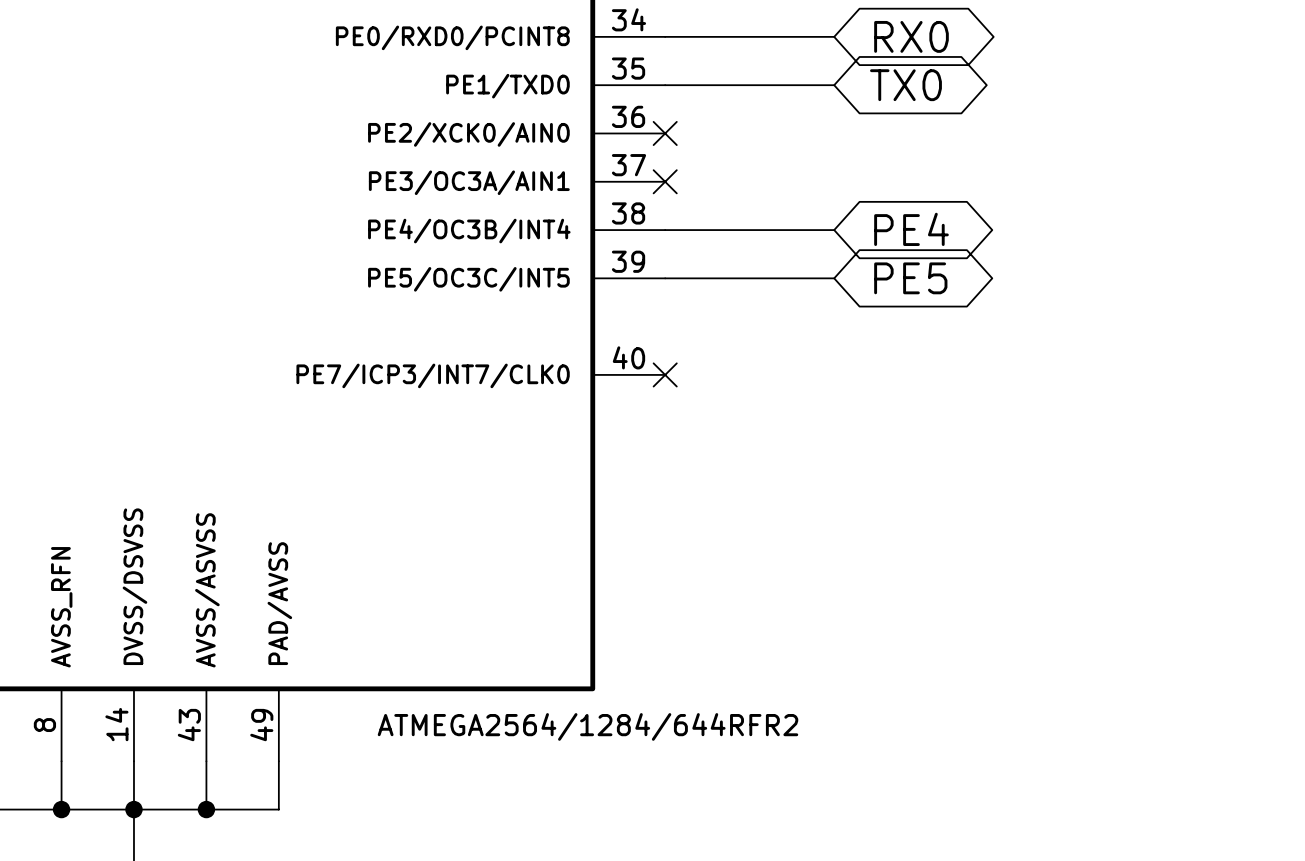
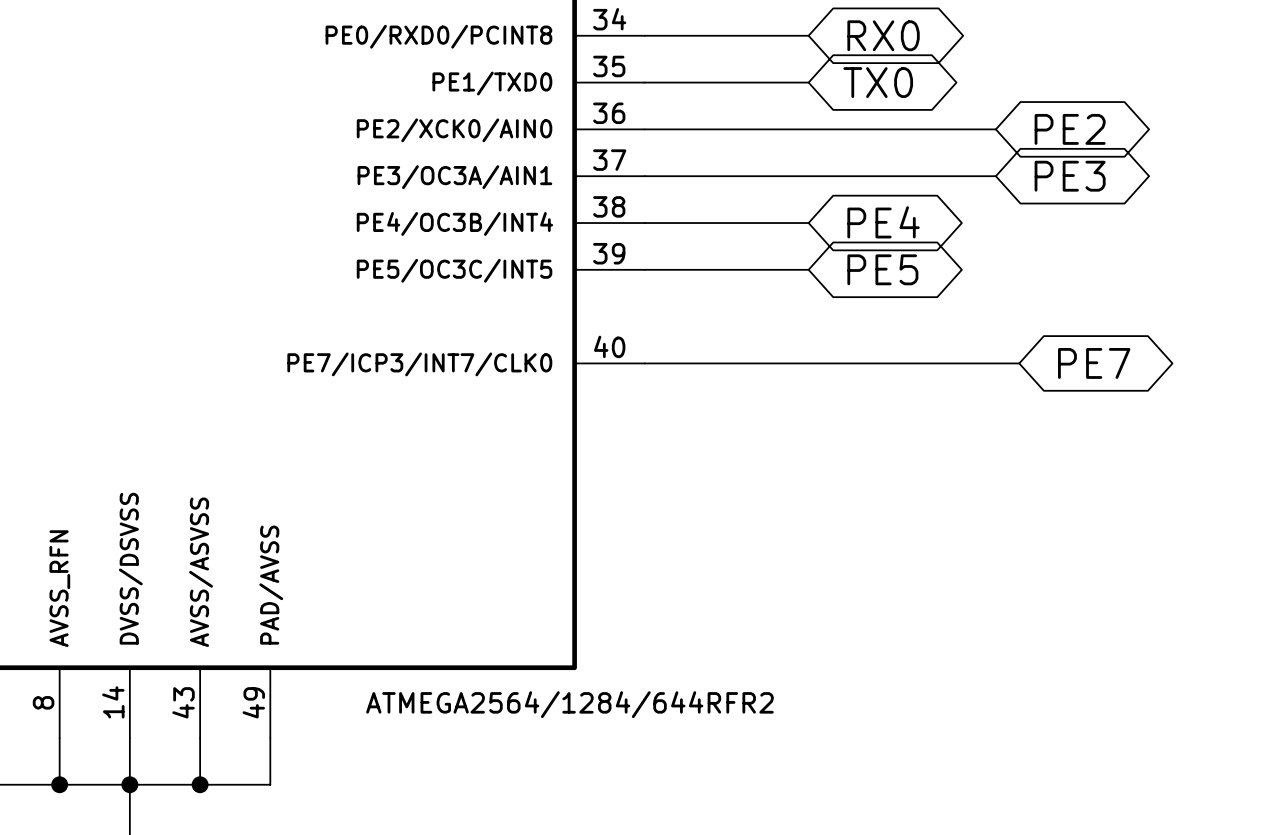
wire: none -> (644, 129) (995, 129)
no-connect mark: (665, 133) -> none
global label: none -> PE2 (1070, 129)
wire: none -> (644, 176) (995, 176)
no-connect mark: (665, 181) -> none
global label: none -> PE3 (1070, 176)
wire: none -> (644, 363) (1019, 363)
no-connect mark: (665, 374) -> none
global label: none -> PE7 (1094, 363)

